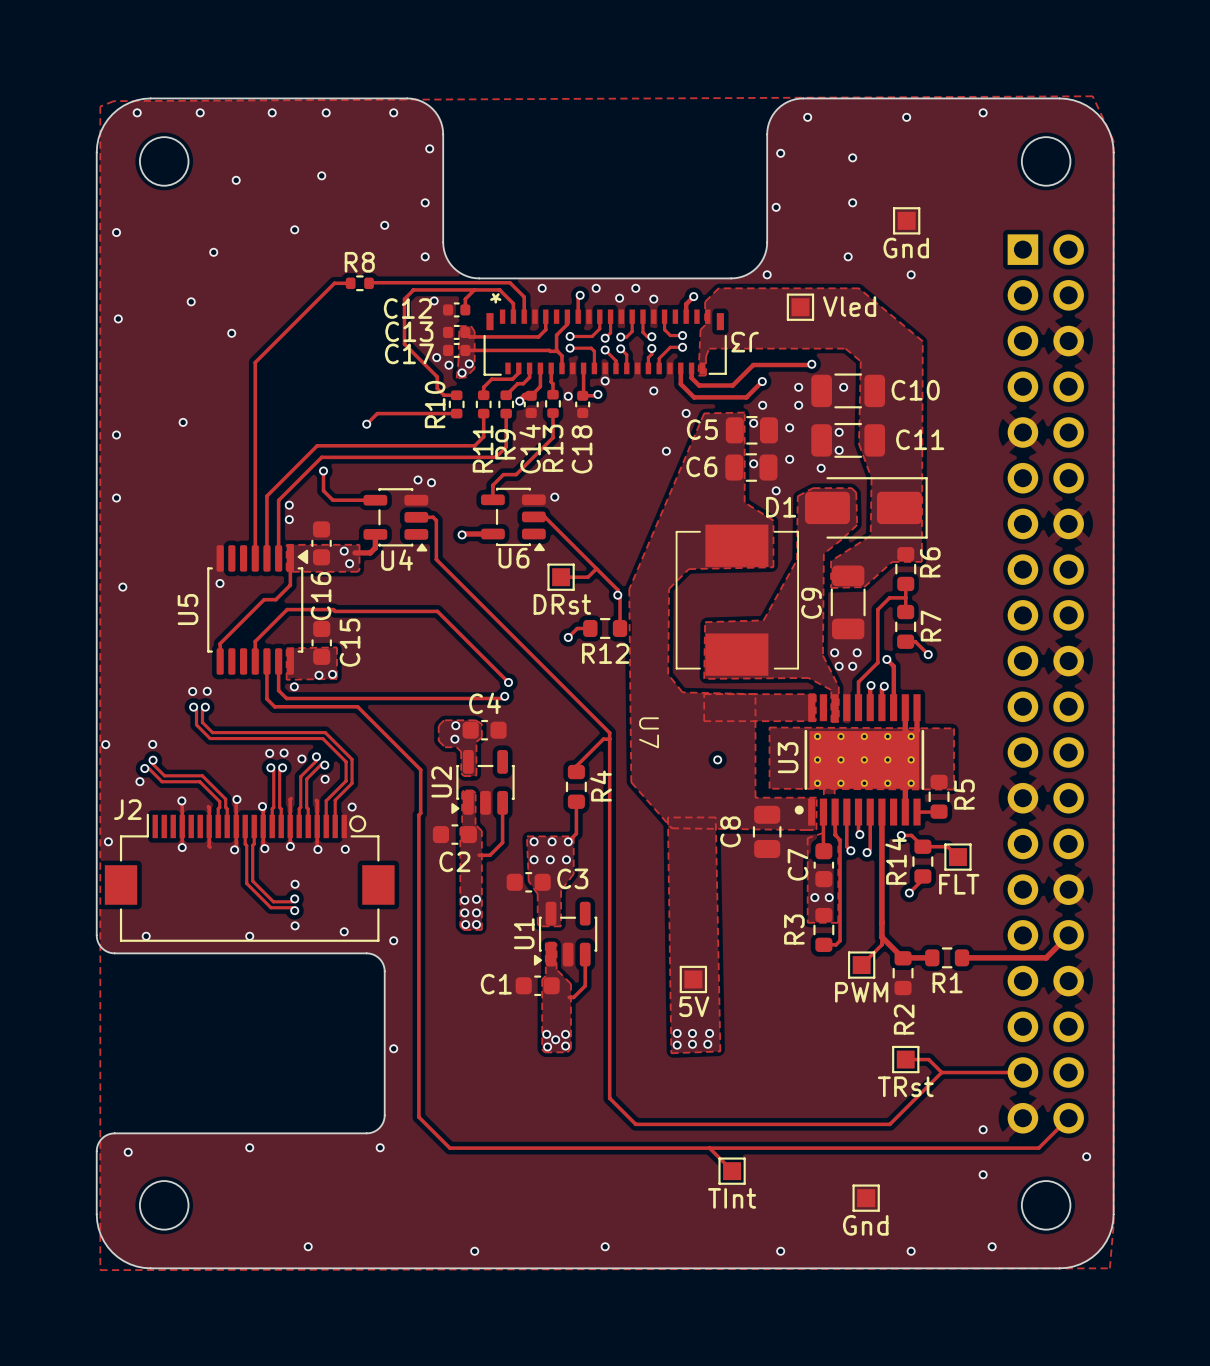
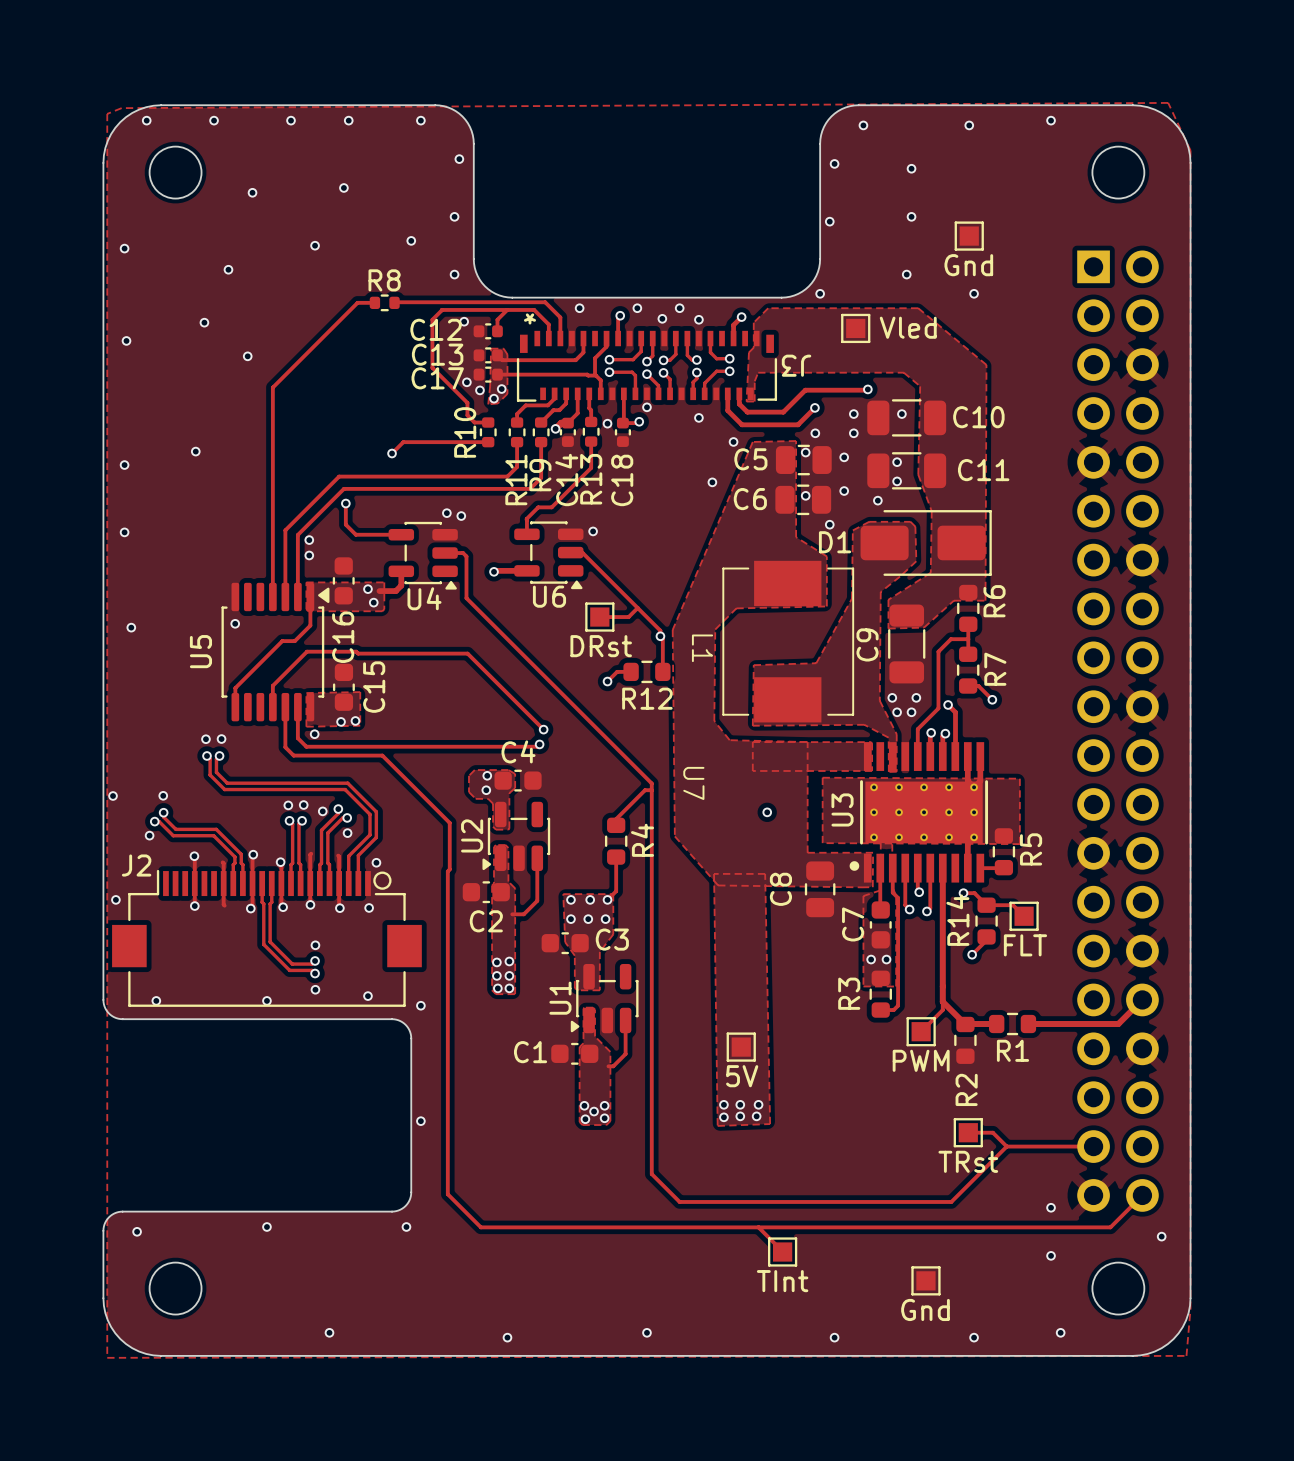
L1 name: none -> L1 (702, 648)

